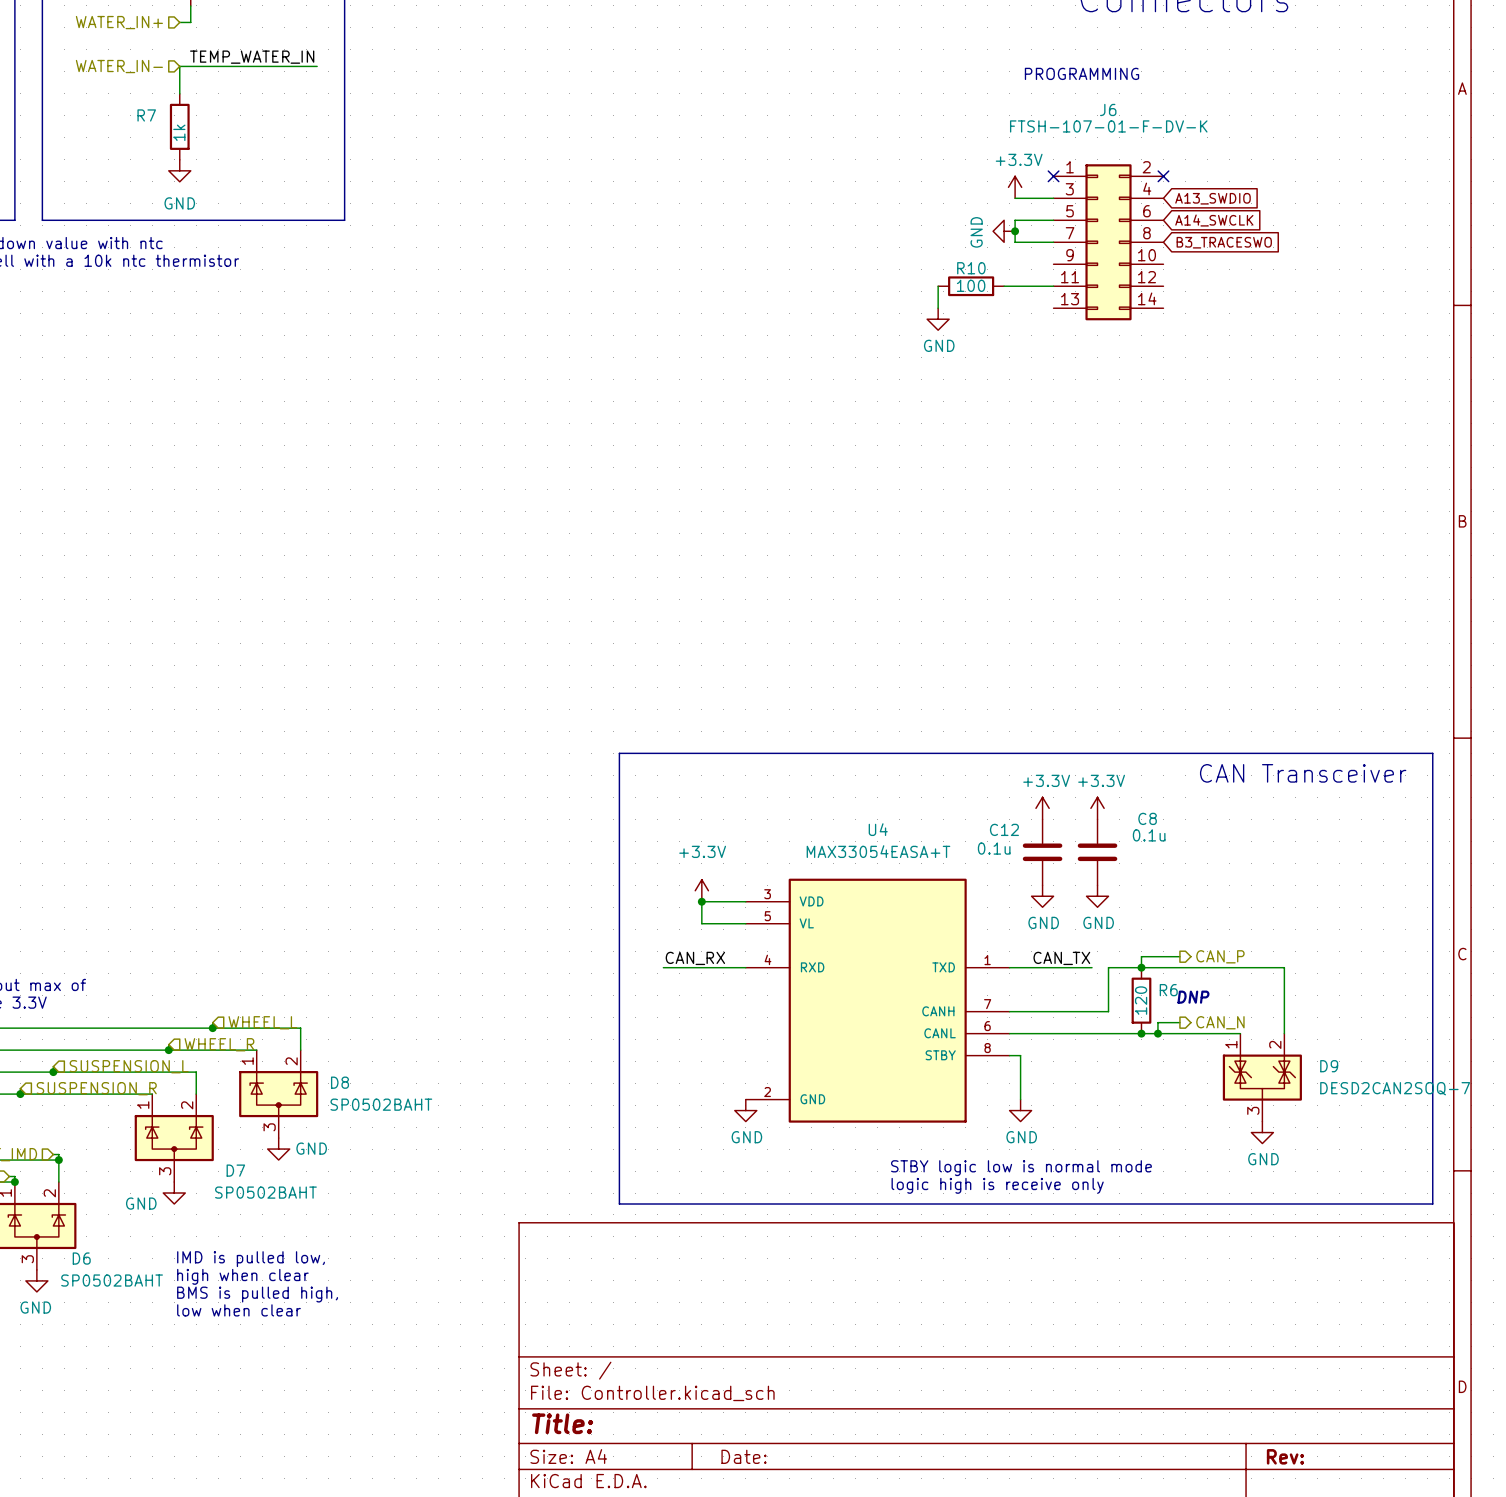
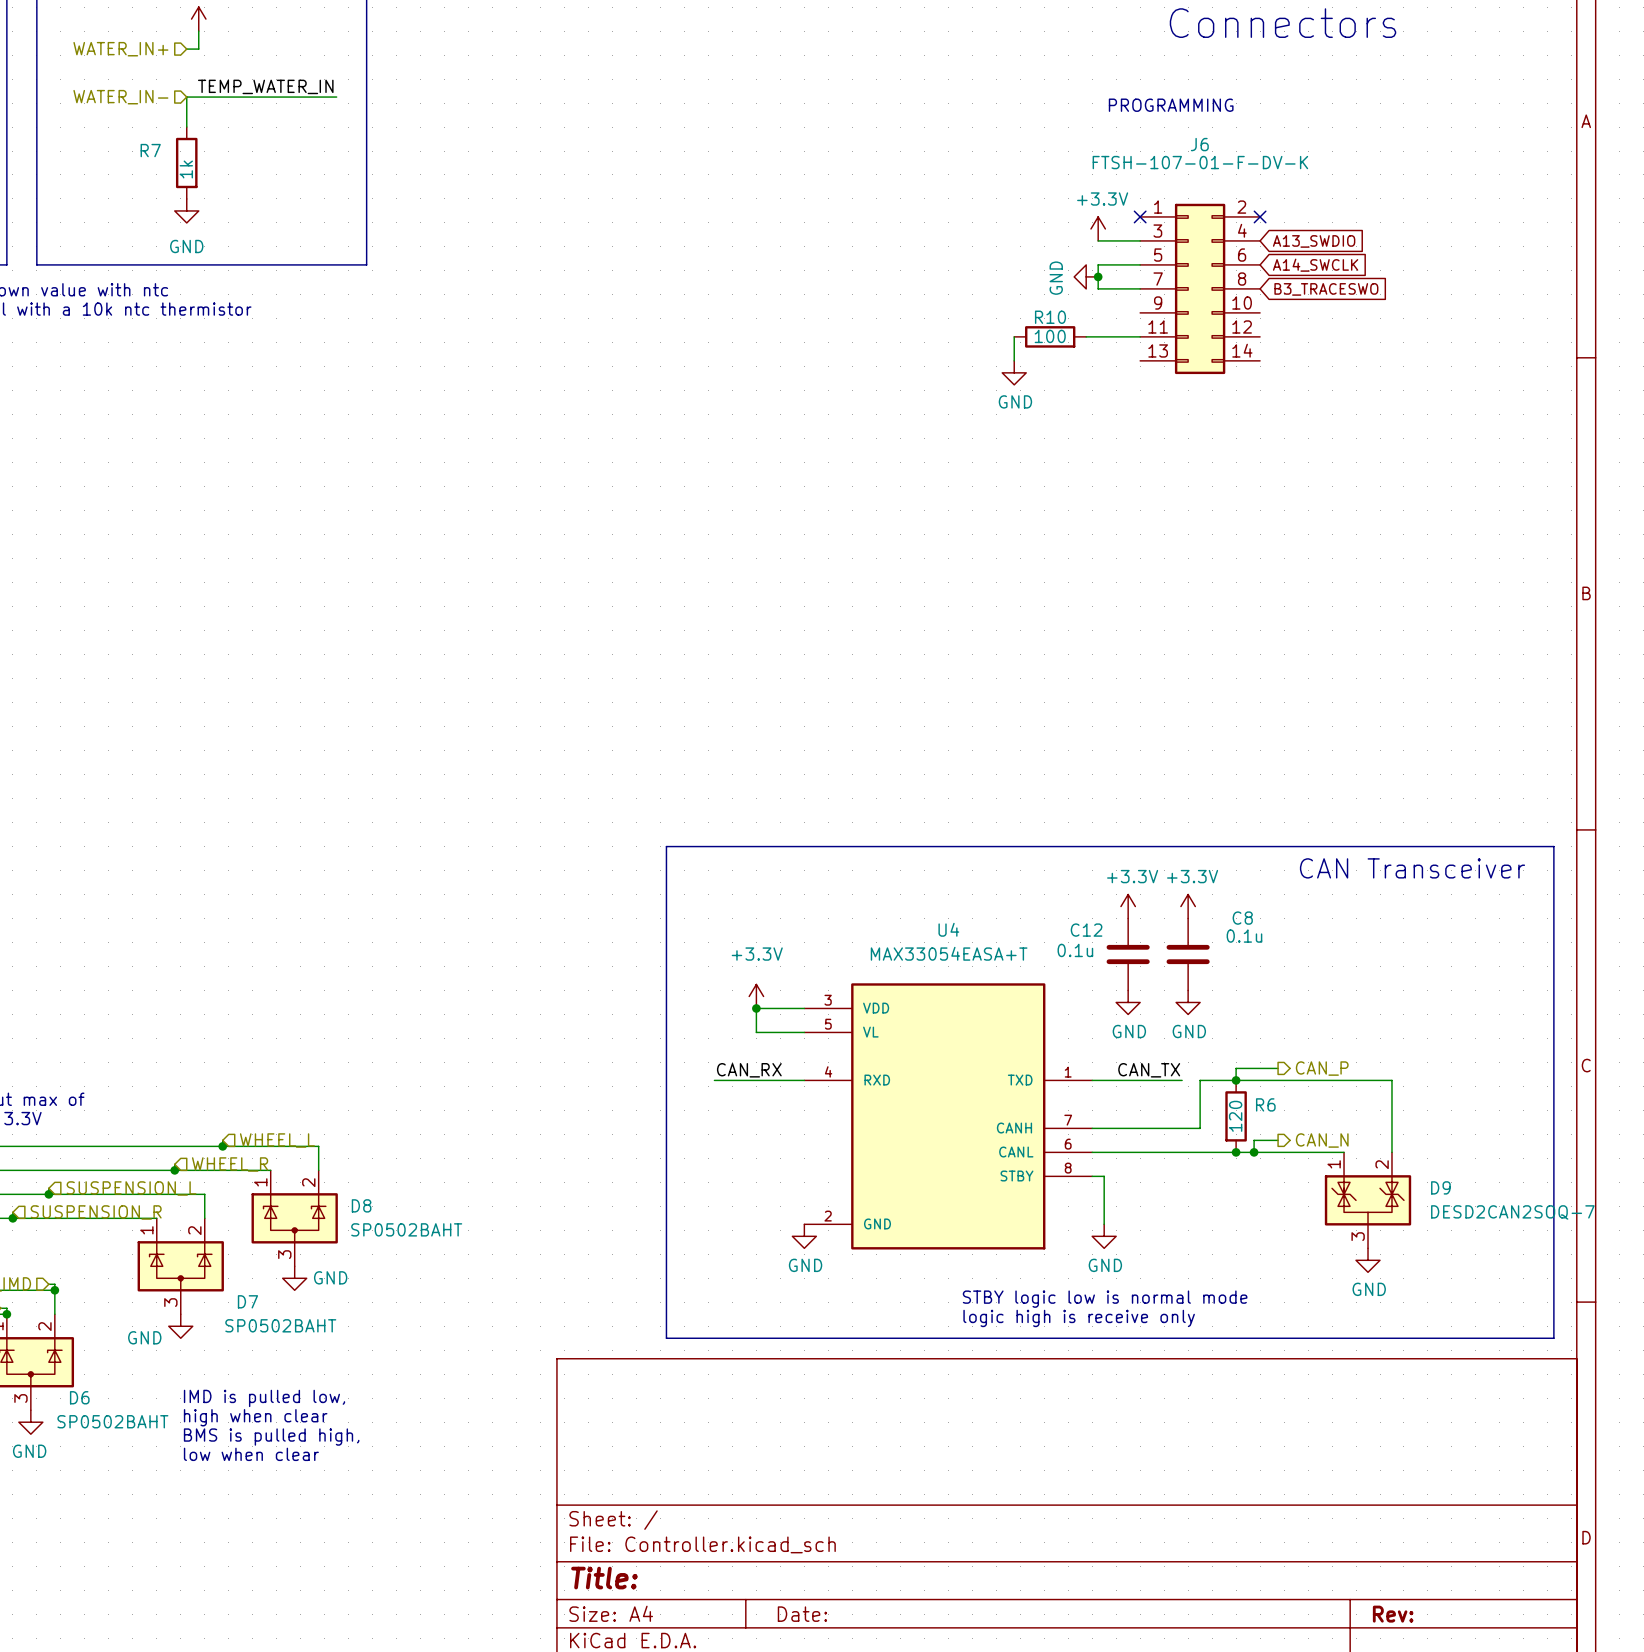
text: DNP (1193, 997) -> none

